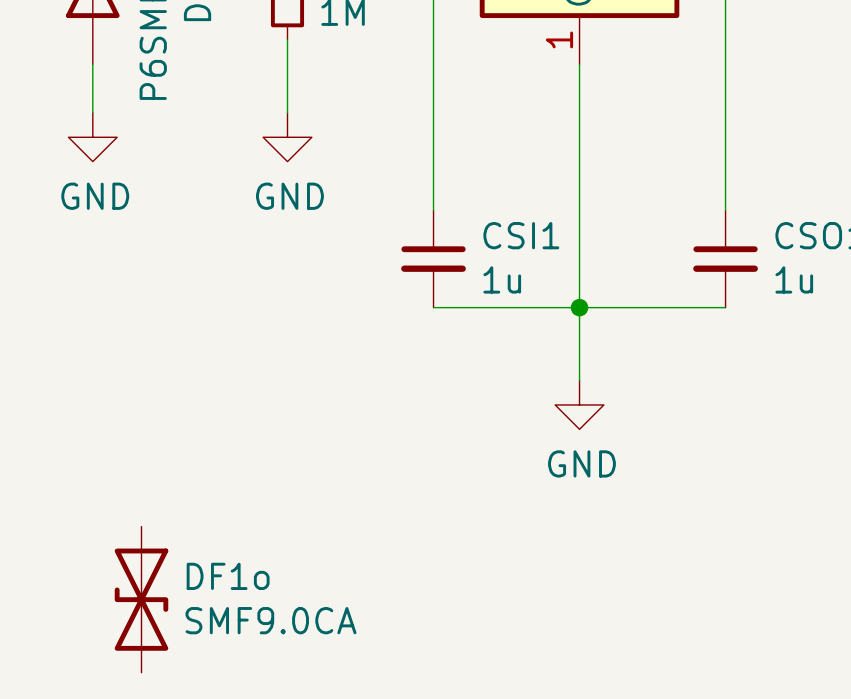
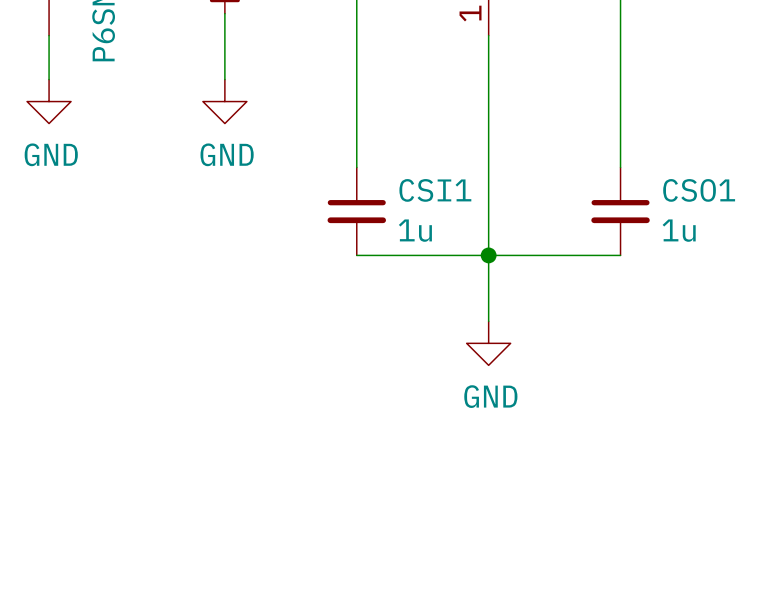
DF1o: SMF9.0CA (141, 599) -> none

